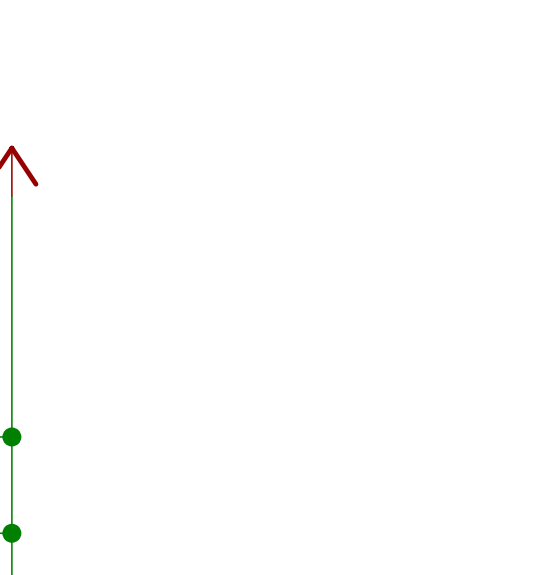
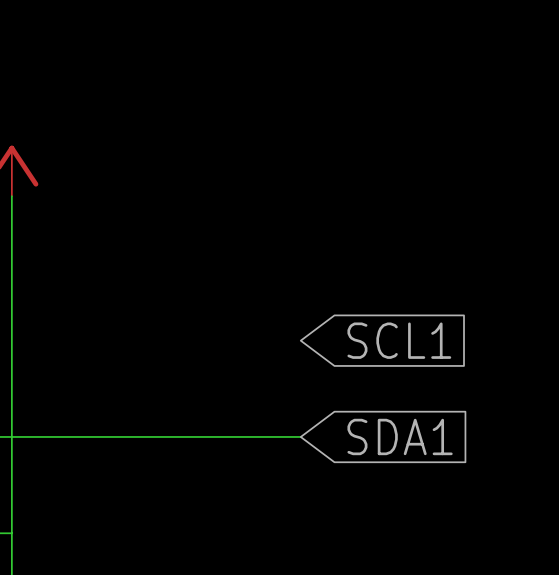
global label: none -> SCL1 (399, 340)
wire: none -> (11, 436) (300, 436)
junction: (11, 436) -> none
global label: none -> SDA1 (400, 436)
junction: (11, 533) -> none

